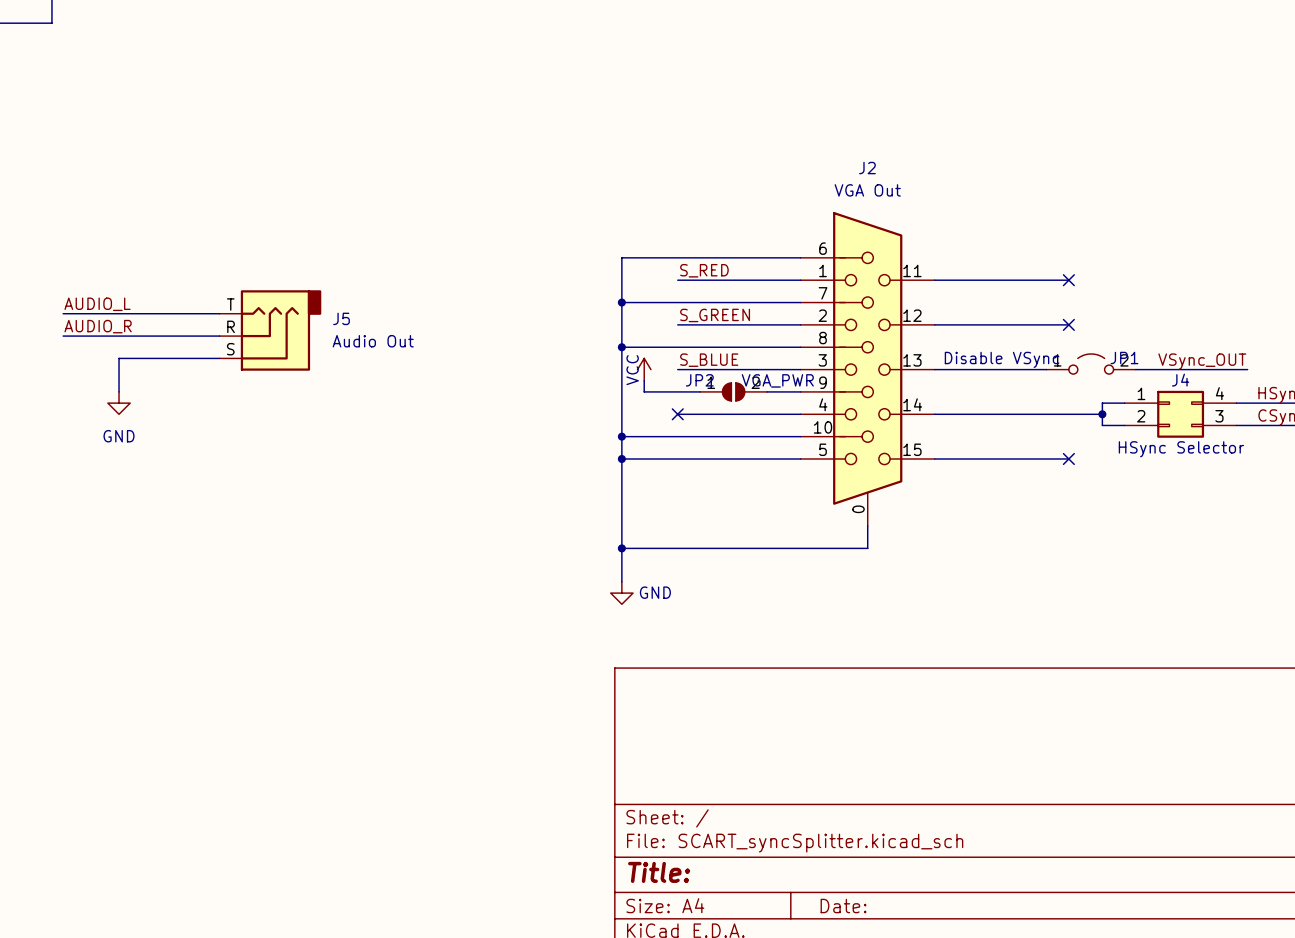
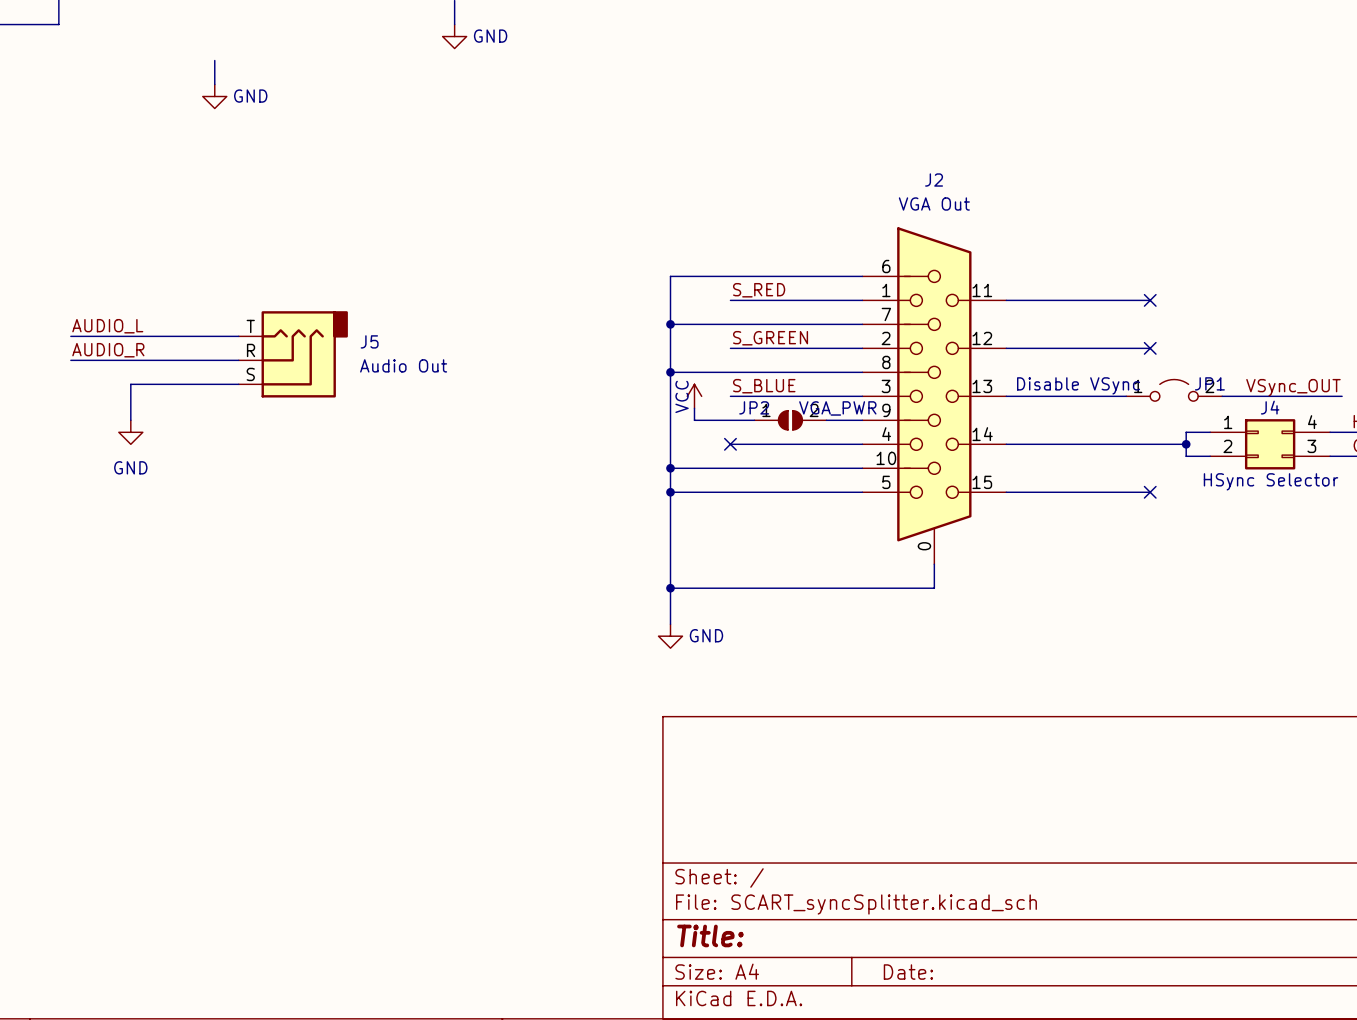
wire: none -> (454, 0) (454, 24)
power symbol: none -> GND (454, 36)
wire: none -> (214, 60) (214, 84)
power symbol: none -> GND (214, 96)

